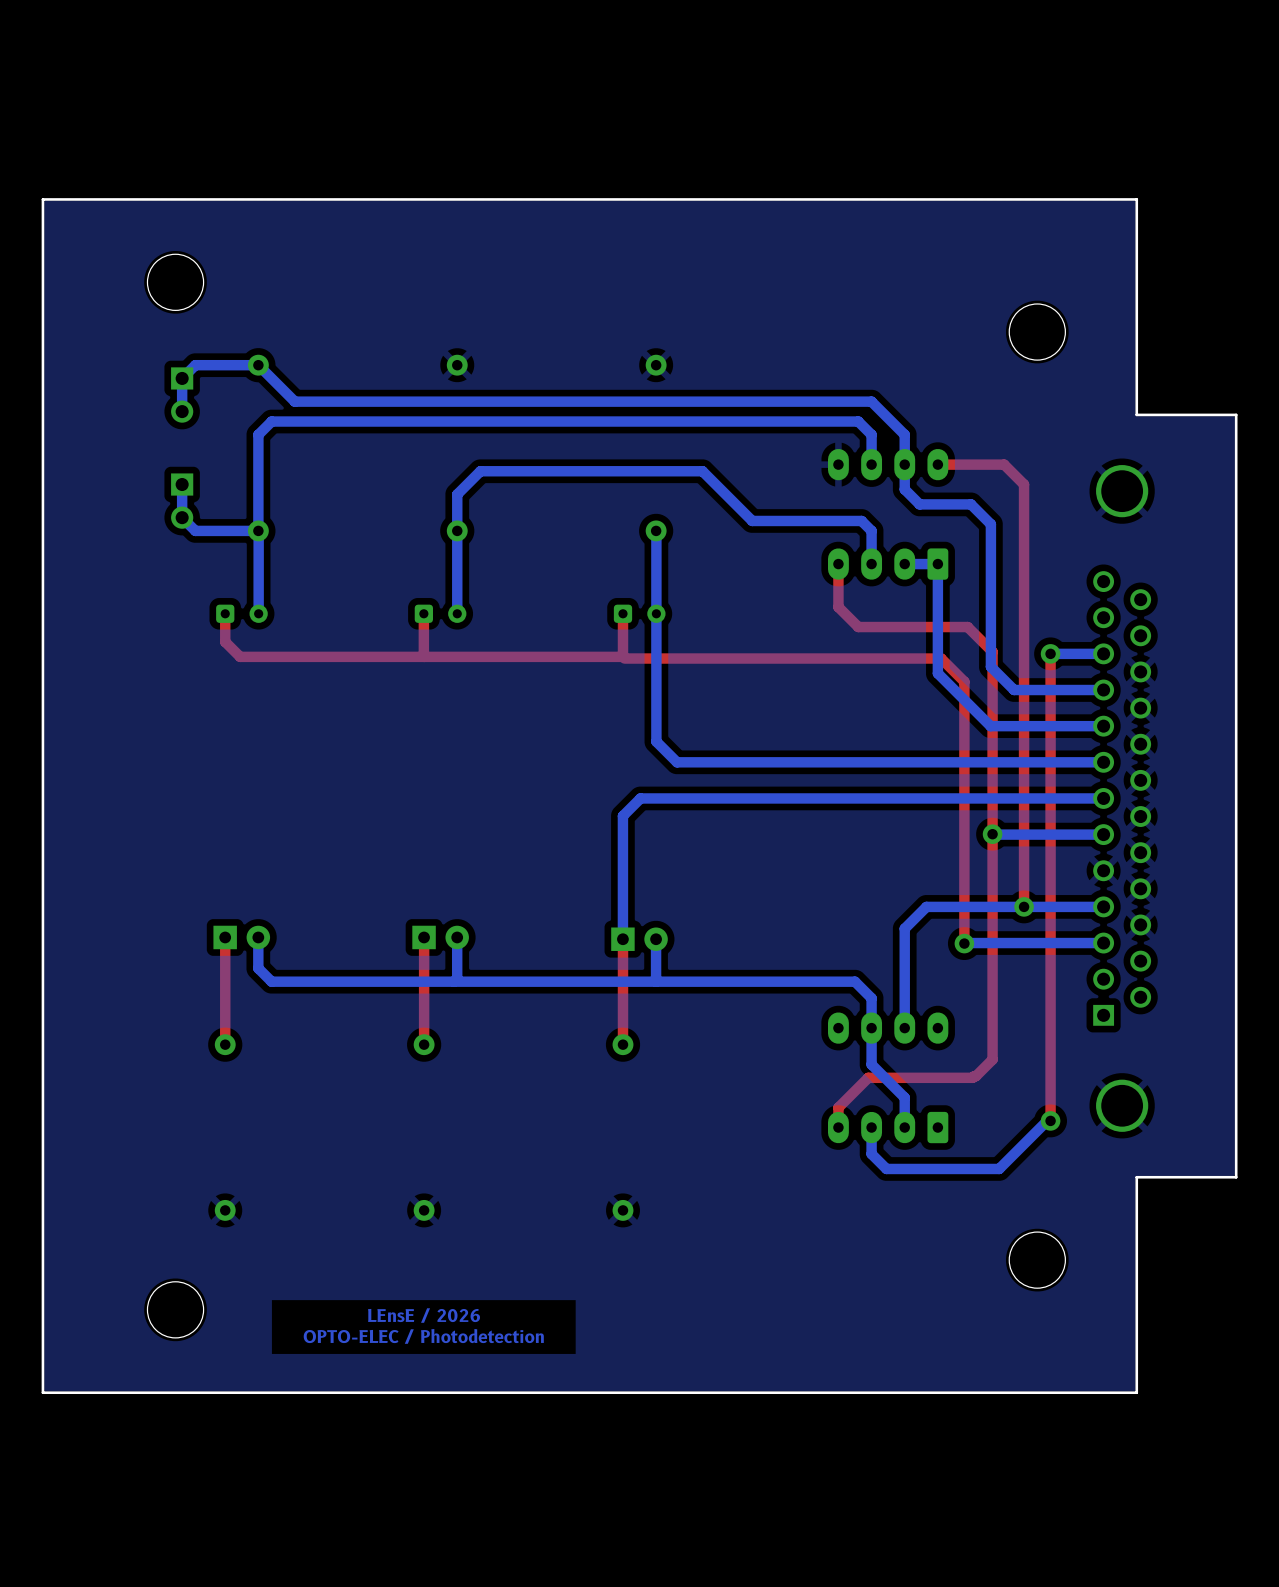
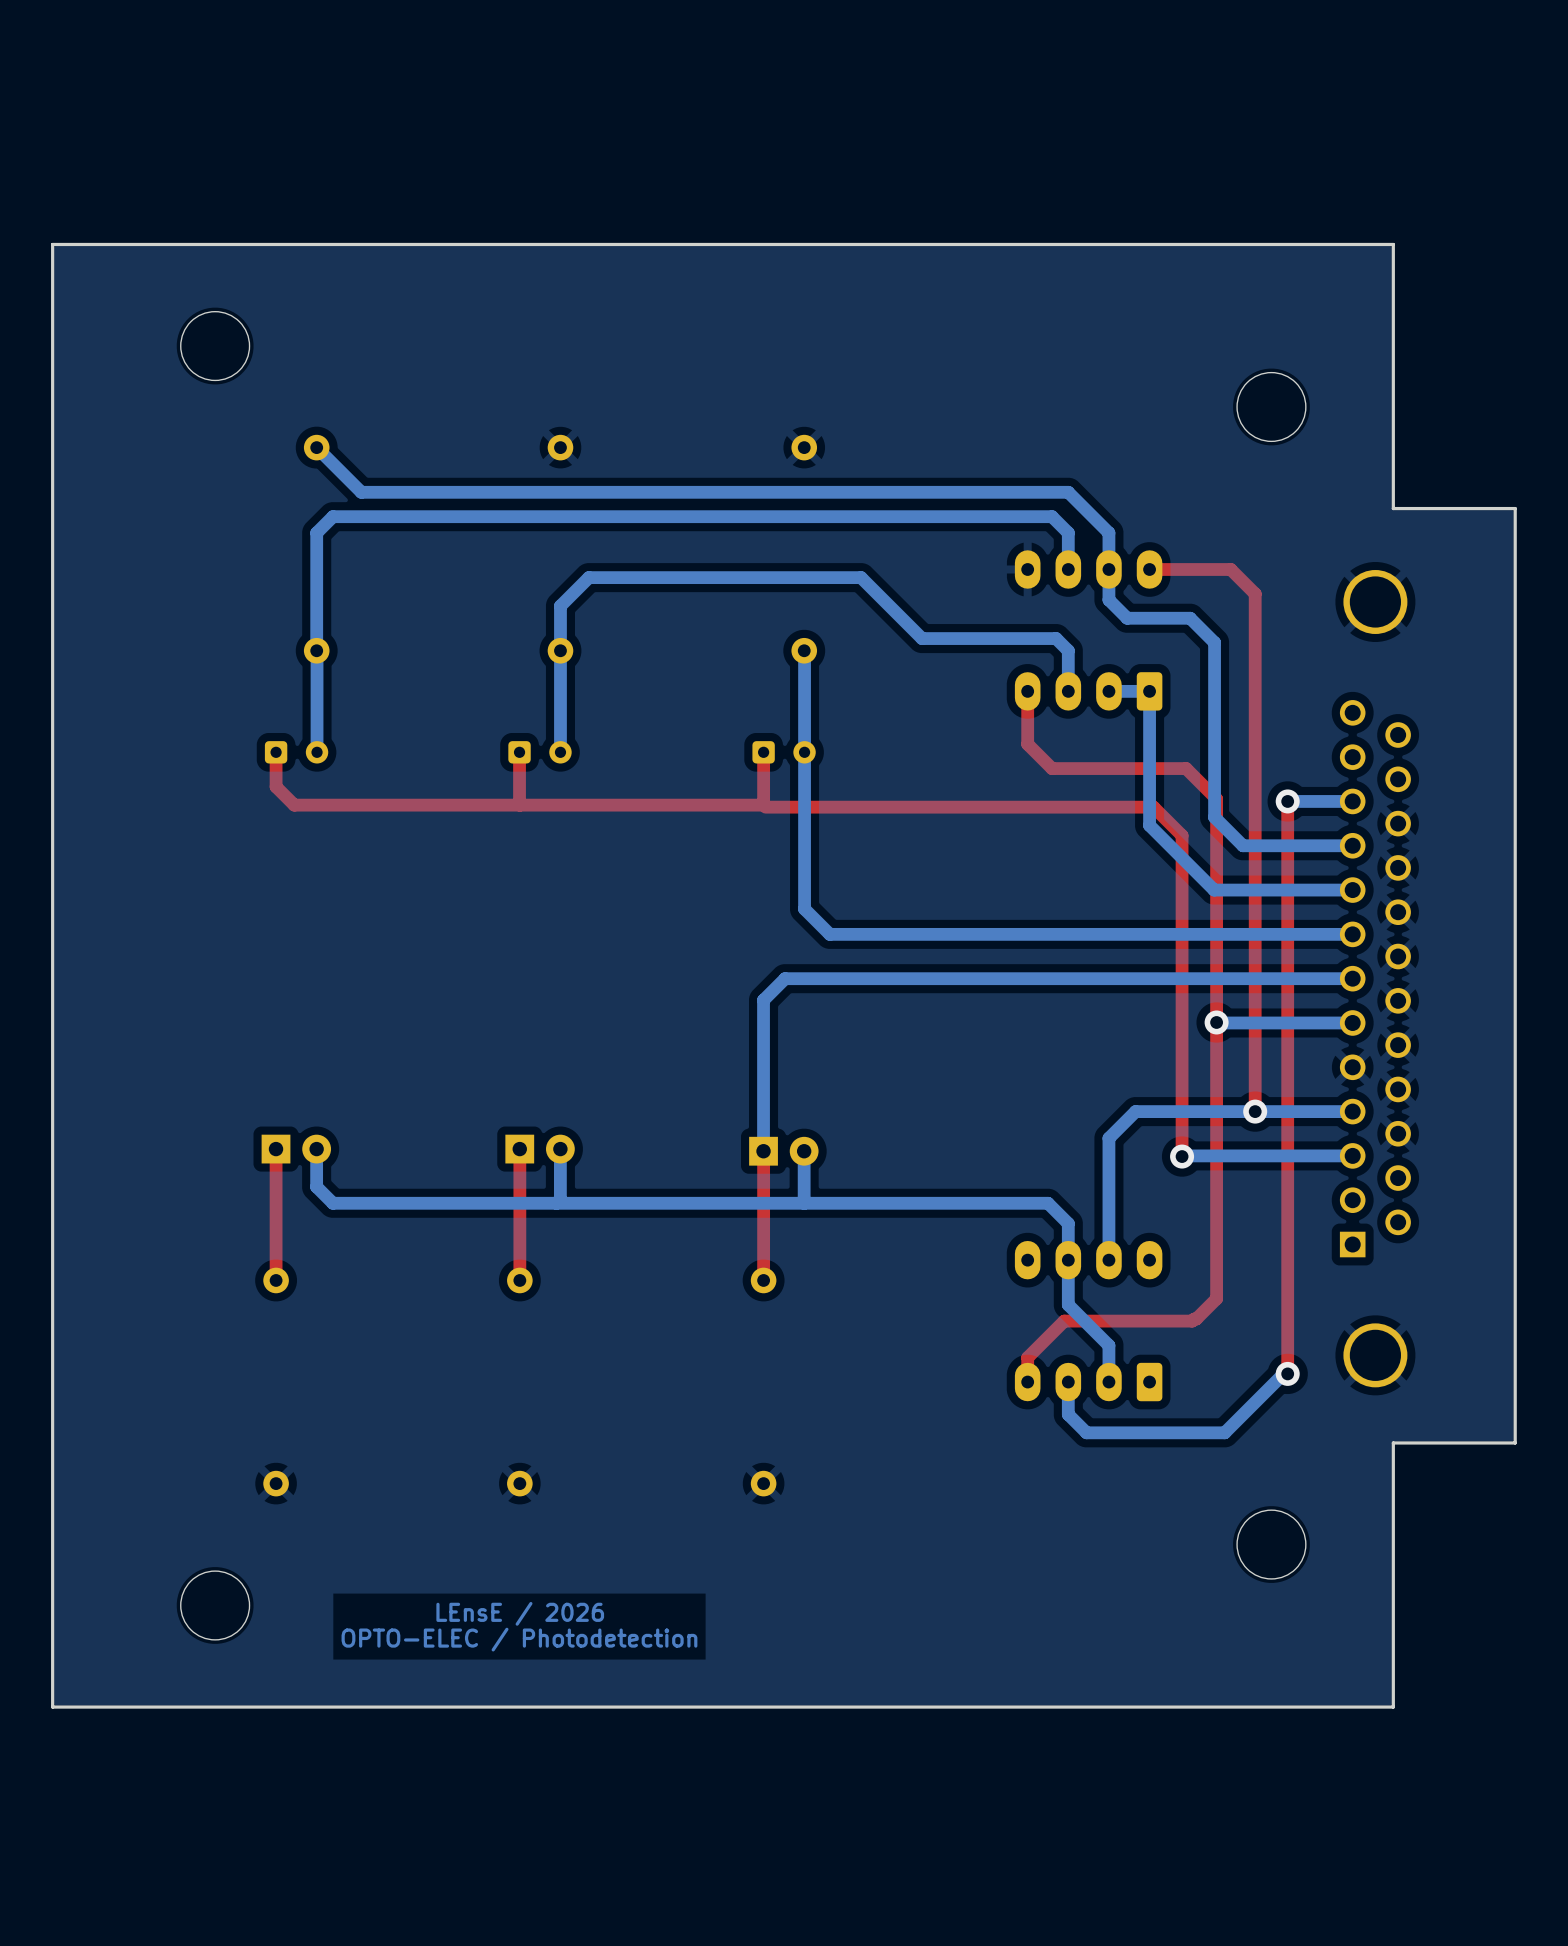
bottom track: (258, 365) (195, 365) (182, 378) (182, 411) -> none
part: (182, 395) -> none
bottom track: (182, 484) (182, 517) (195, 530) (258, 530) -> none
part: (182, 501) -> none

